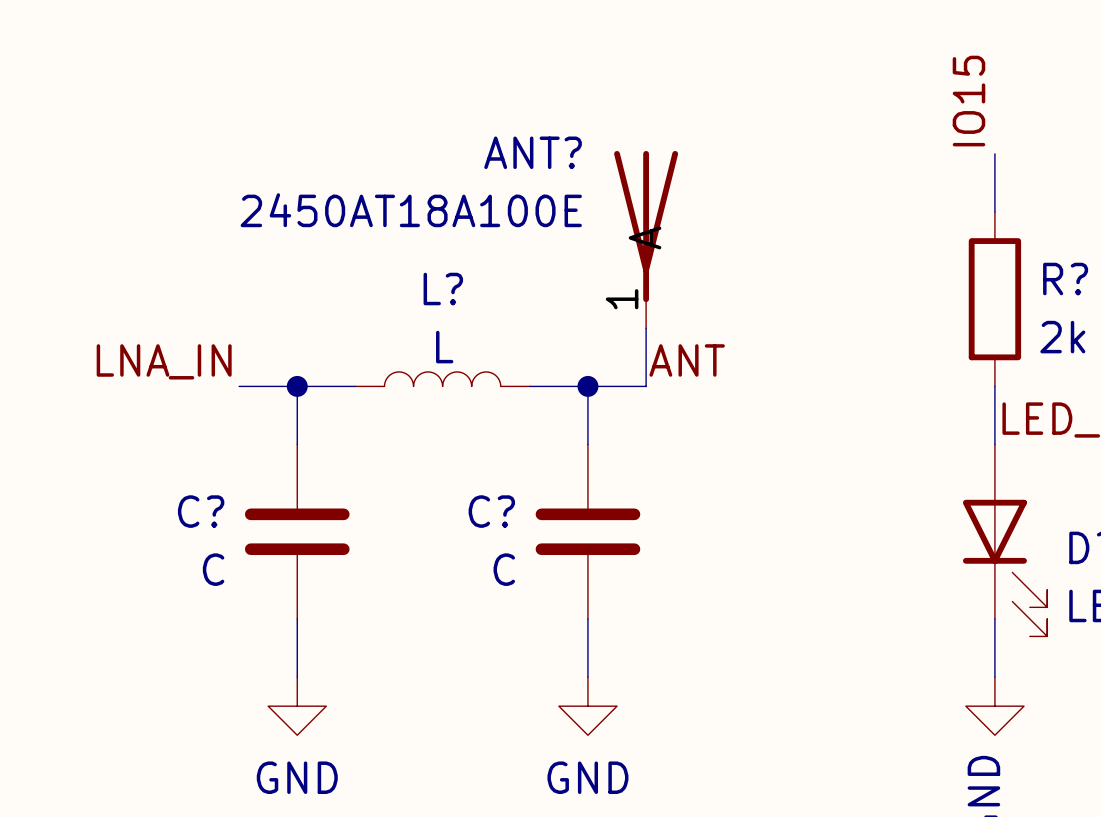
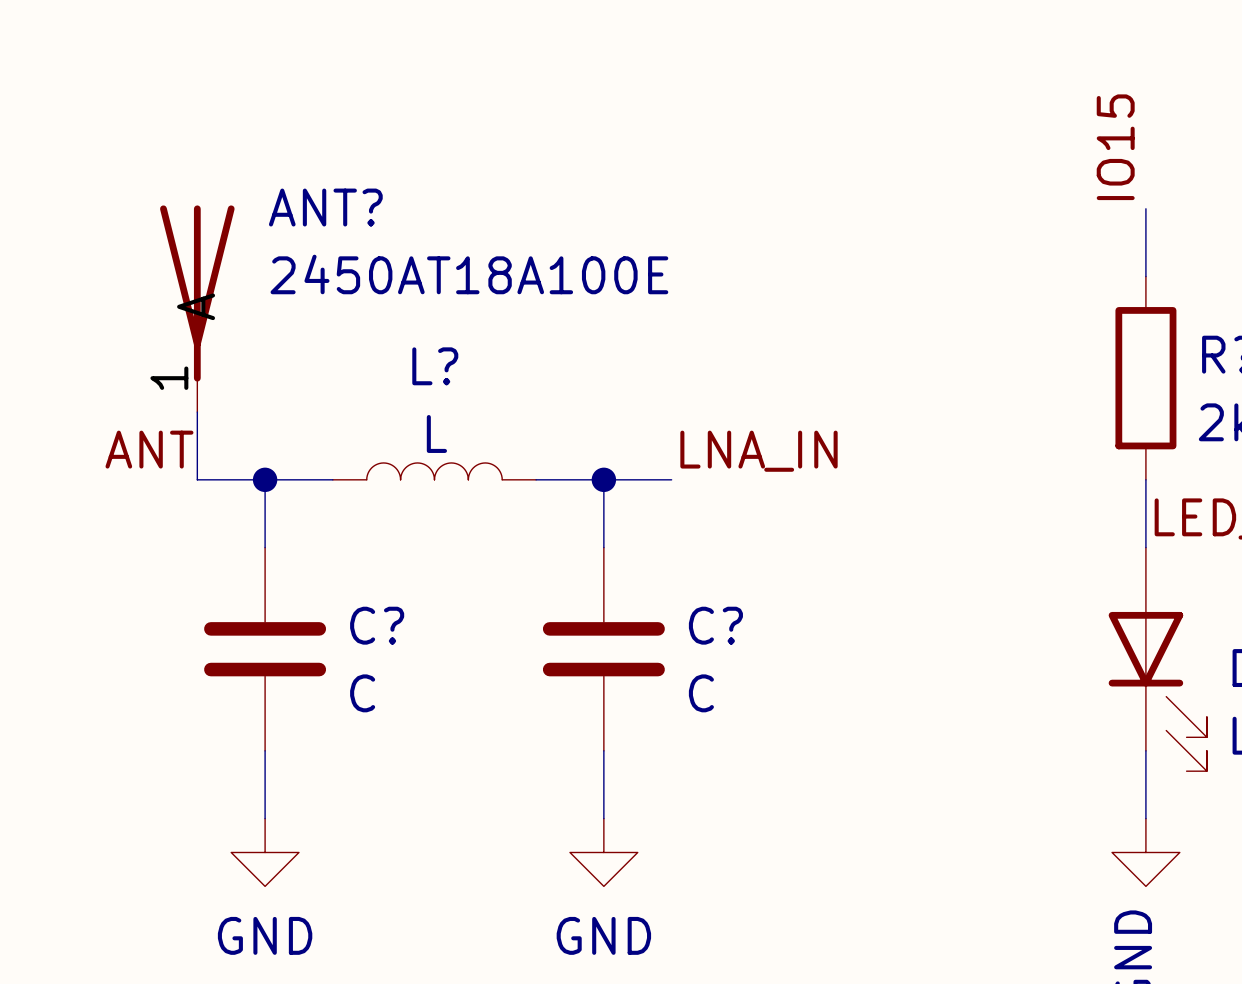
ANT? name position: ANT? (533, 152) -> ANT? (325, 207)
ANT? value position: 2450AT18A100E (411, 210) -> 2450AT18A100E (469, 274)
ANT? position: (646, 239) -> (197, 308)
wire: none -> (197, 412) (197, 479) (265, 479) (265, 547)
wire: (646, 328) (646, 386) (587, 386) (587, 444) -> none
label position: ANT (687, 360) -> ANT (149, 449)
label position: LNA_IN (164, 361) -> LNA_IN (759, 451)
L? position: (442, 379) -> (434, 471)
junction position: (297, 386) -> (265, 479)
wire: (355, 386) (297, 386) (297, 444) -> none
wire: none -> (536, 479) (603, 479) (603, 547)
junction position: (587, 386) -> (603, 479)
C? name position: C? (201, 511) -> C? (377, 625)
C? name position: C? (491, 511) -> C? (715, 625)
C? position: (297, 531) -> (265, 649)
C? position: (587, 531) -> (603, 649)
C? value position: C (213, 569) -> C (362, 693)
C? value position: C (504, 569) -> C (701, 693)
wire: (297, 618) (297, 677) -> (265, 750) (265, 818)
wire: (587, 618) (587, 677) -> (603, 750) (603, 818)
power symbol position: GND (297, 706) -> GND (265, 852)
power symbol position: GND (587, 706) -> GND (603, 852)

